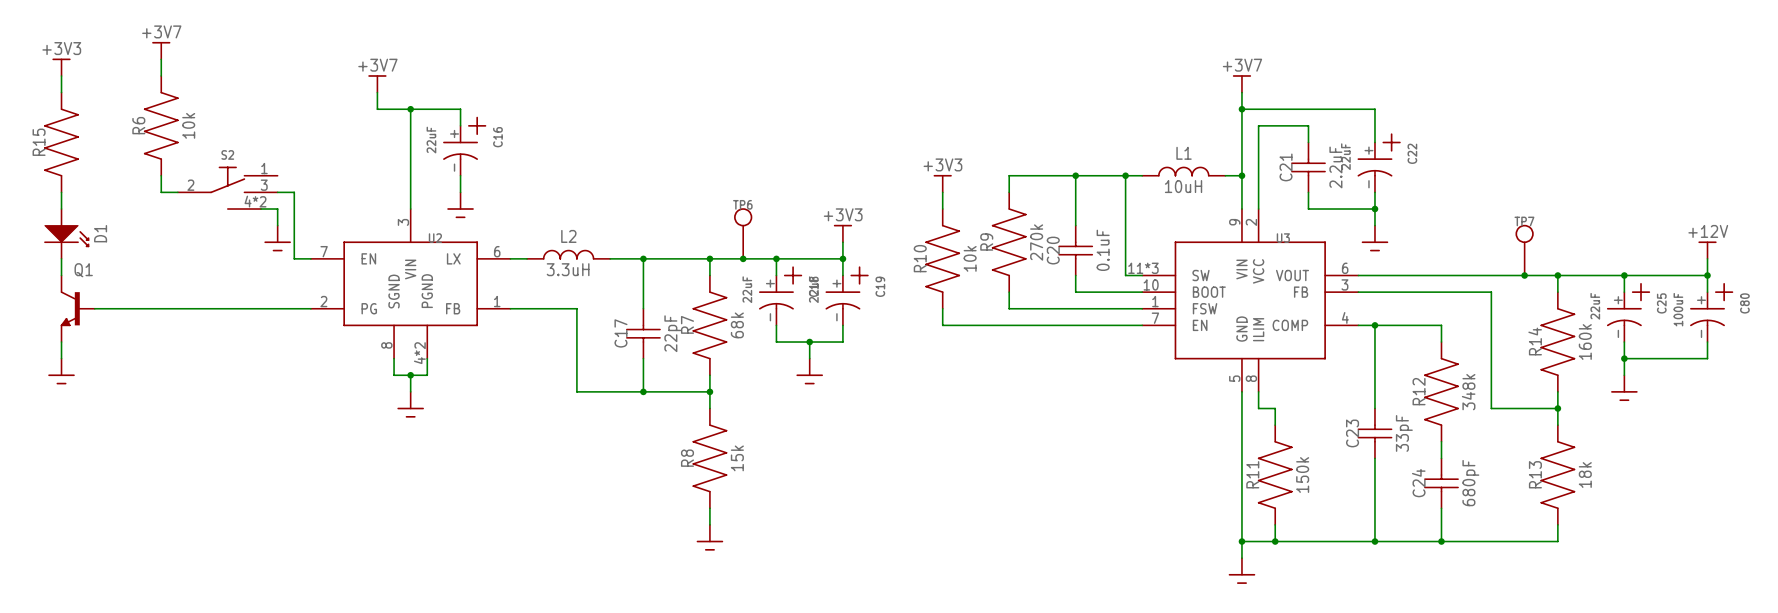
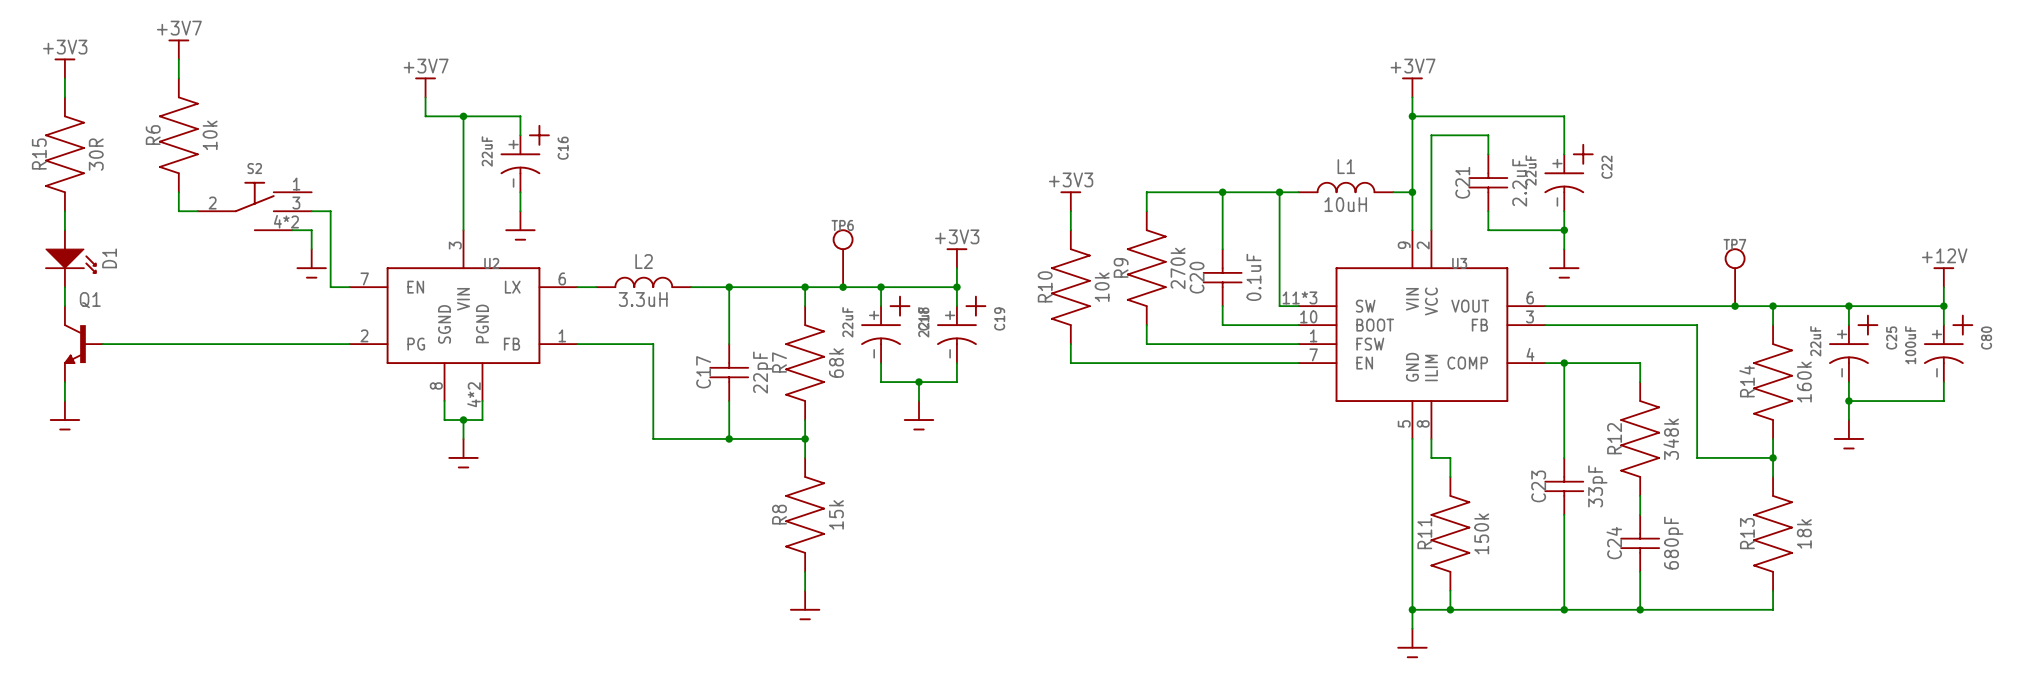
R15 value: none -> 30R (96, 154)

